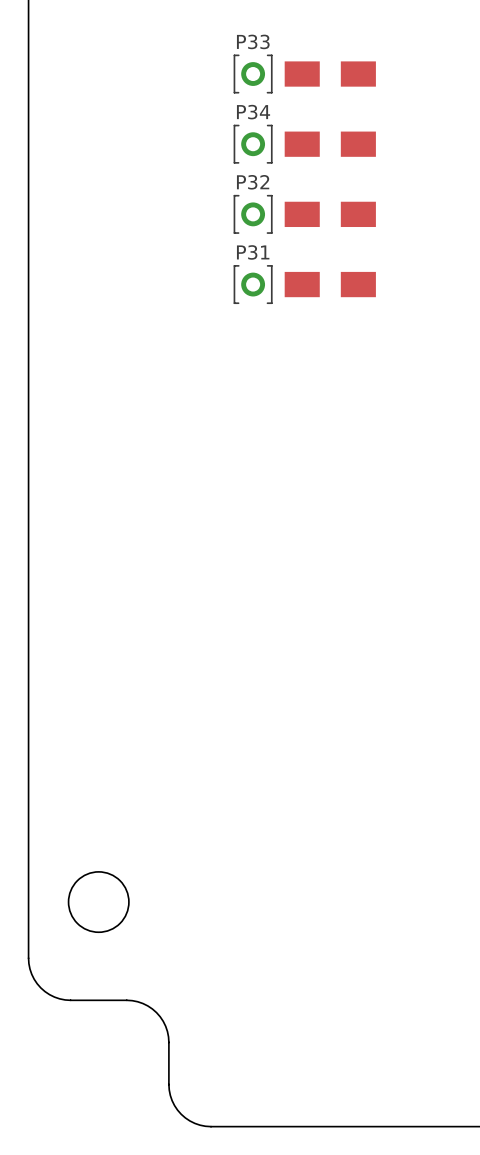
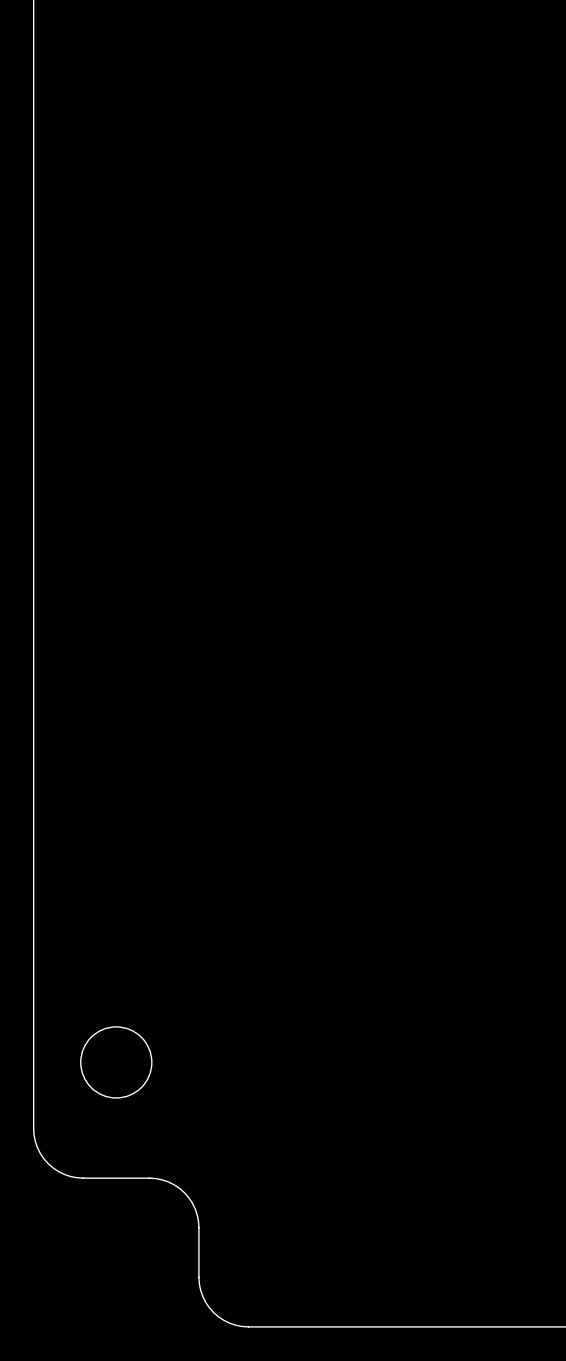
P33: (253, 74) -> none
part: (330, 74) -> none
P34: (253, 144) -> none
part: (330, 144) -> none
P32: (253, 214) -> none
part: (330, 214) -> none
P31: (253, 284) -> none
part: (330, 284) -> none

